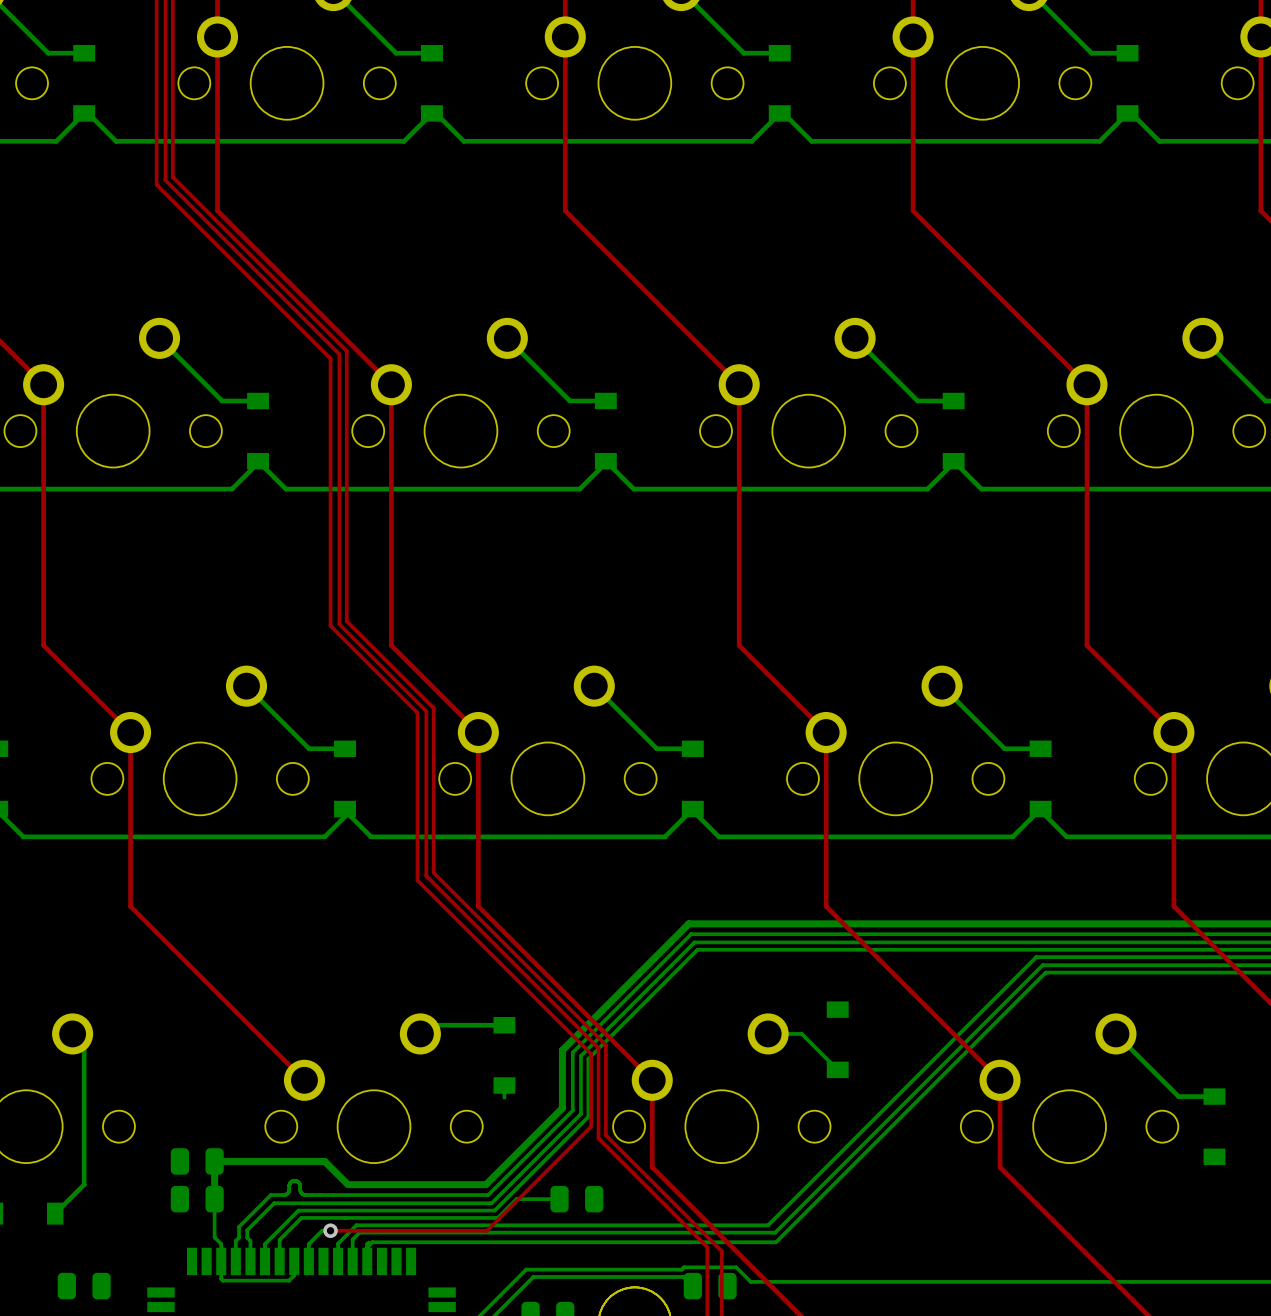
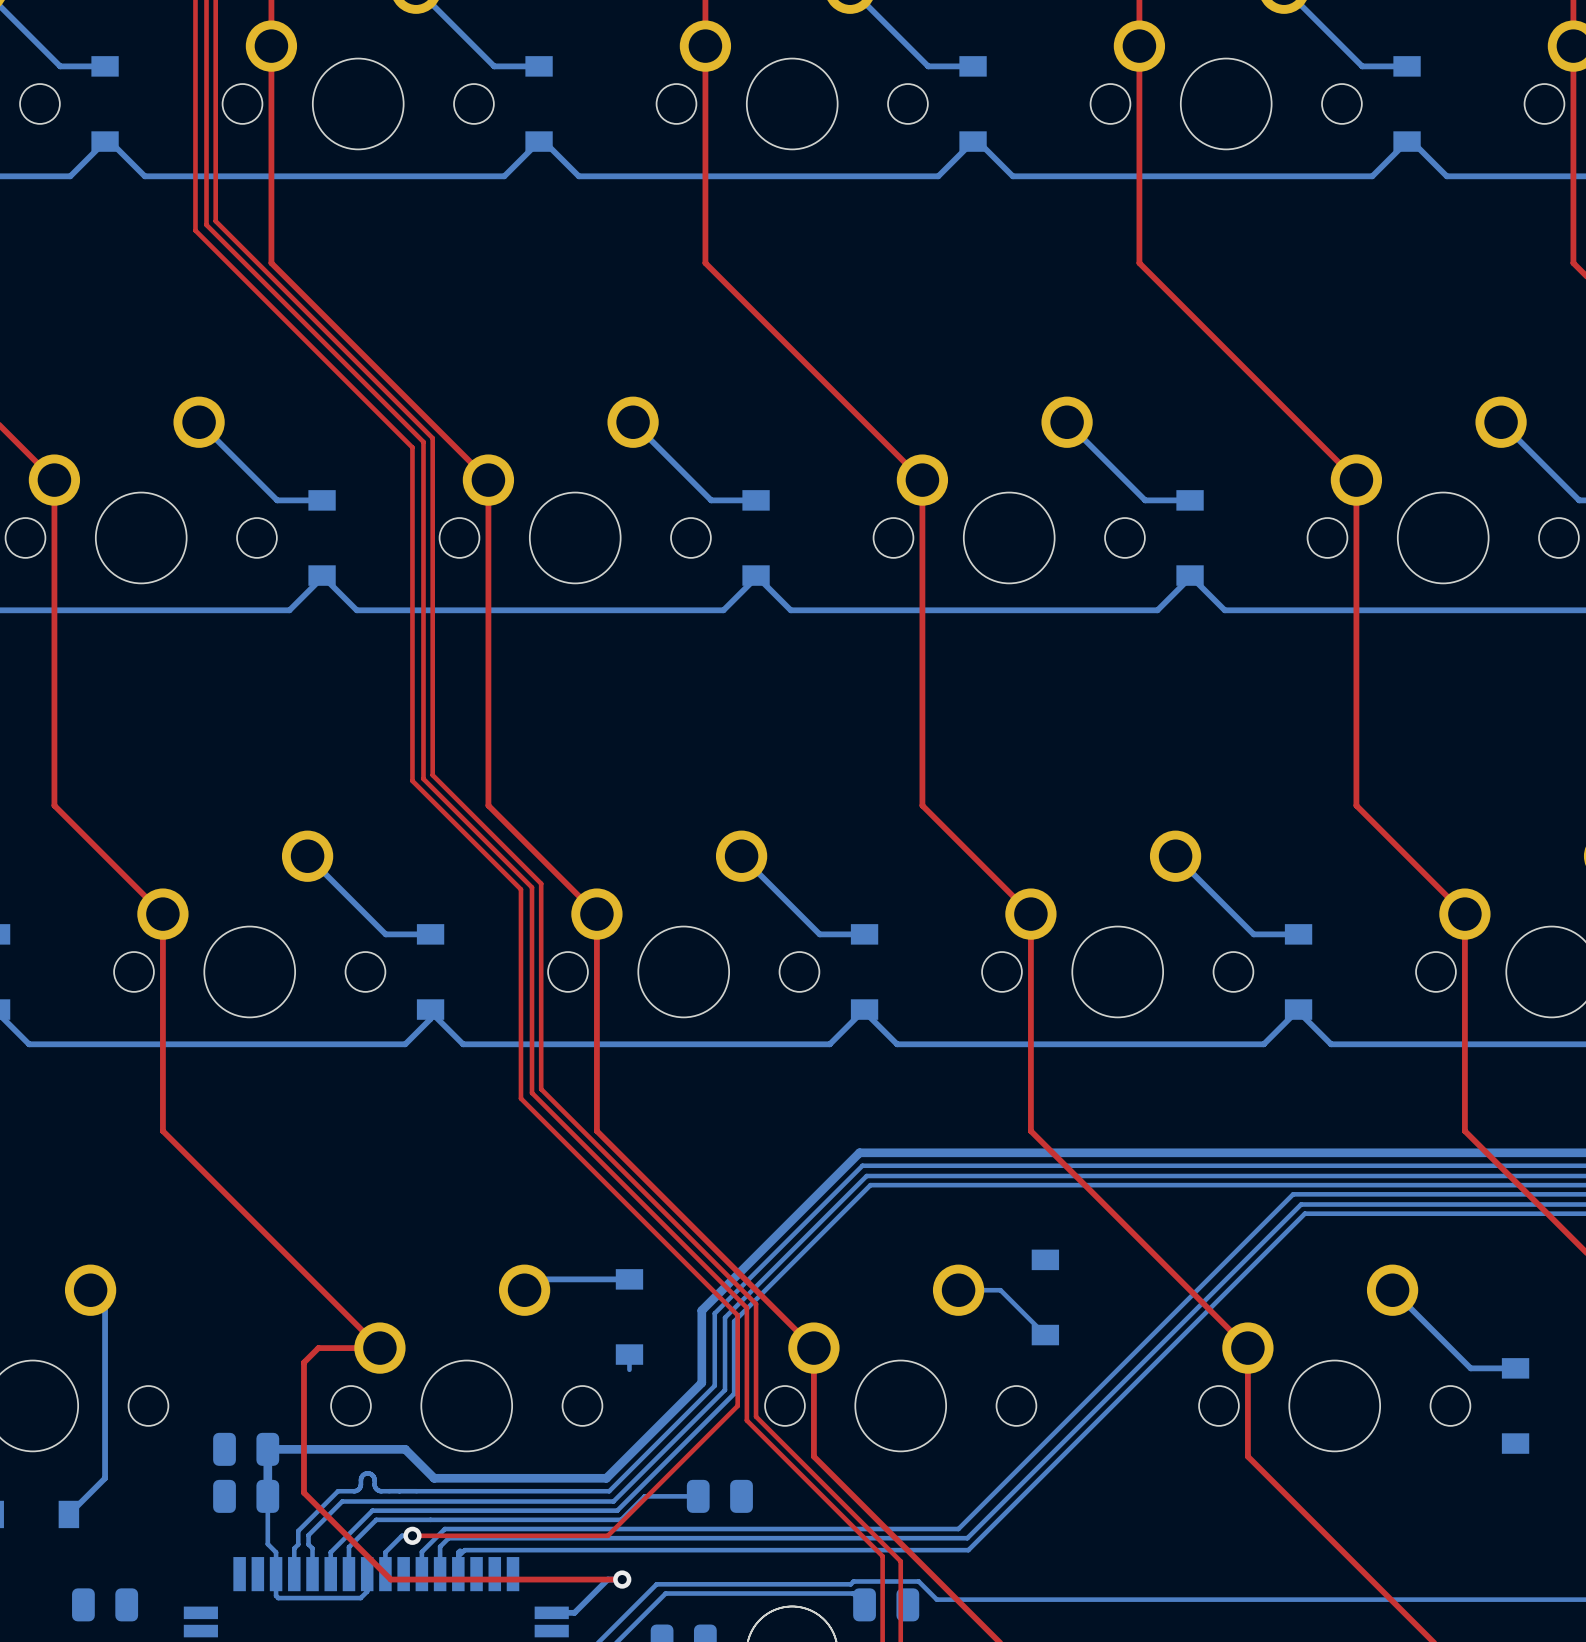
top track: none -> (379, 1348) (318, 1348) (303, 1362) (303, 1492) (390, 1579) (622, 1579)
bottom track: none -> (622, 1579) (607, 1579) (574, 1612) (551, 1612)
via: none -> (622, 1579)

